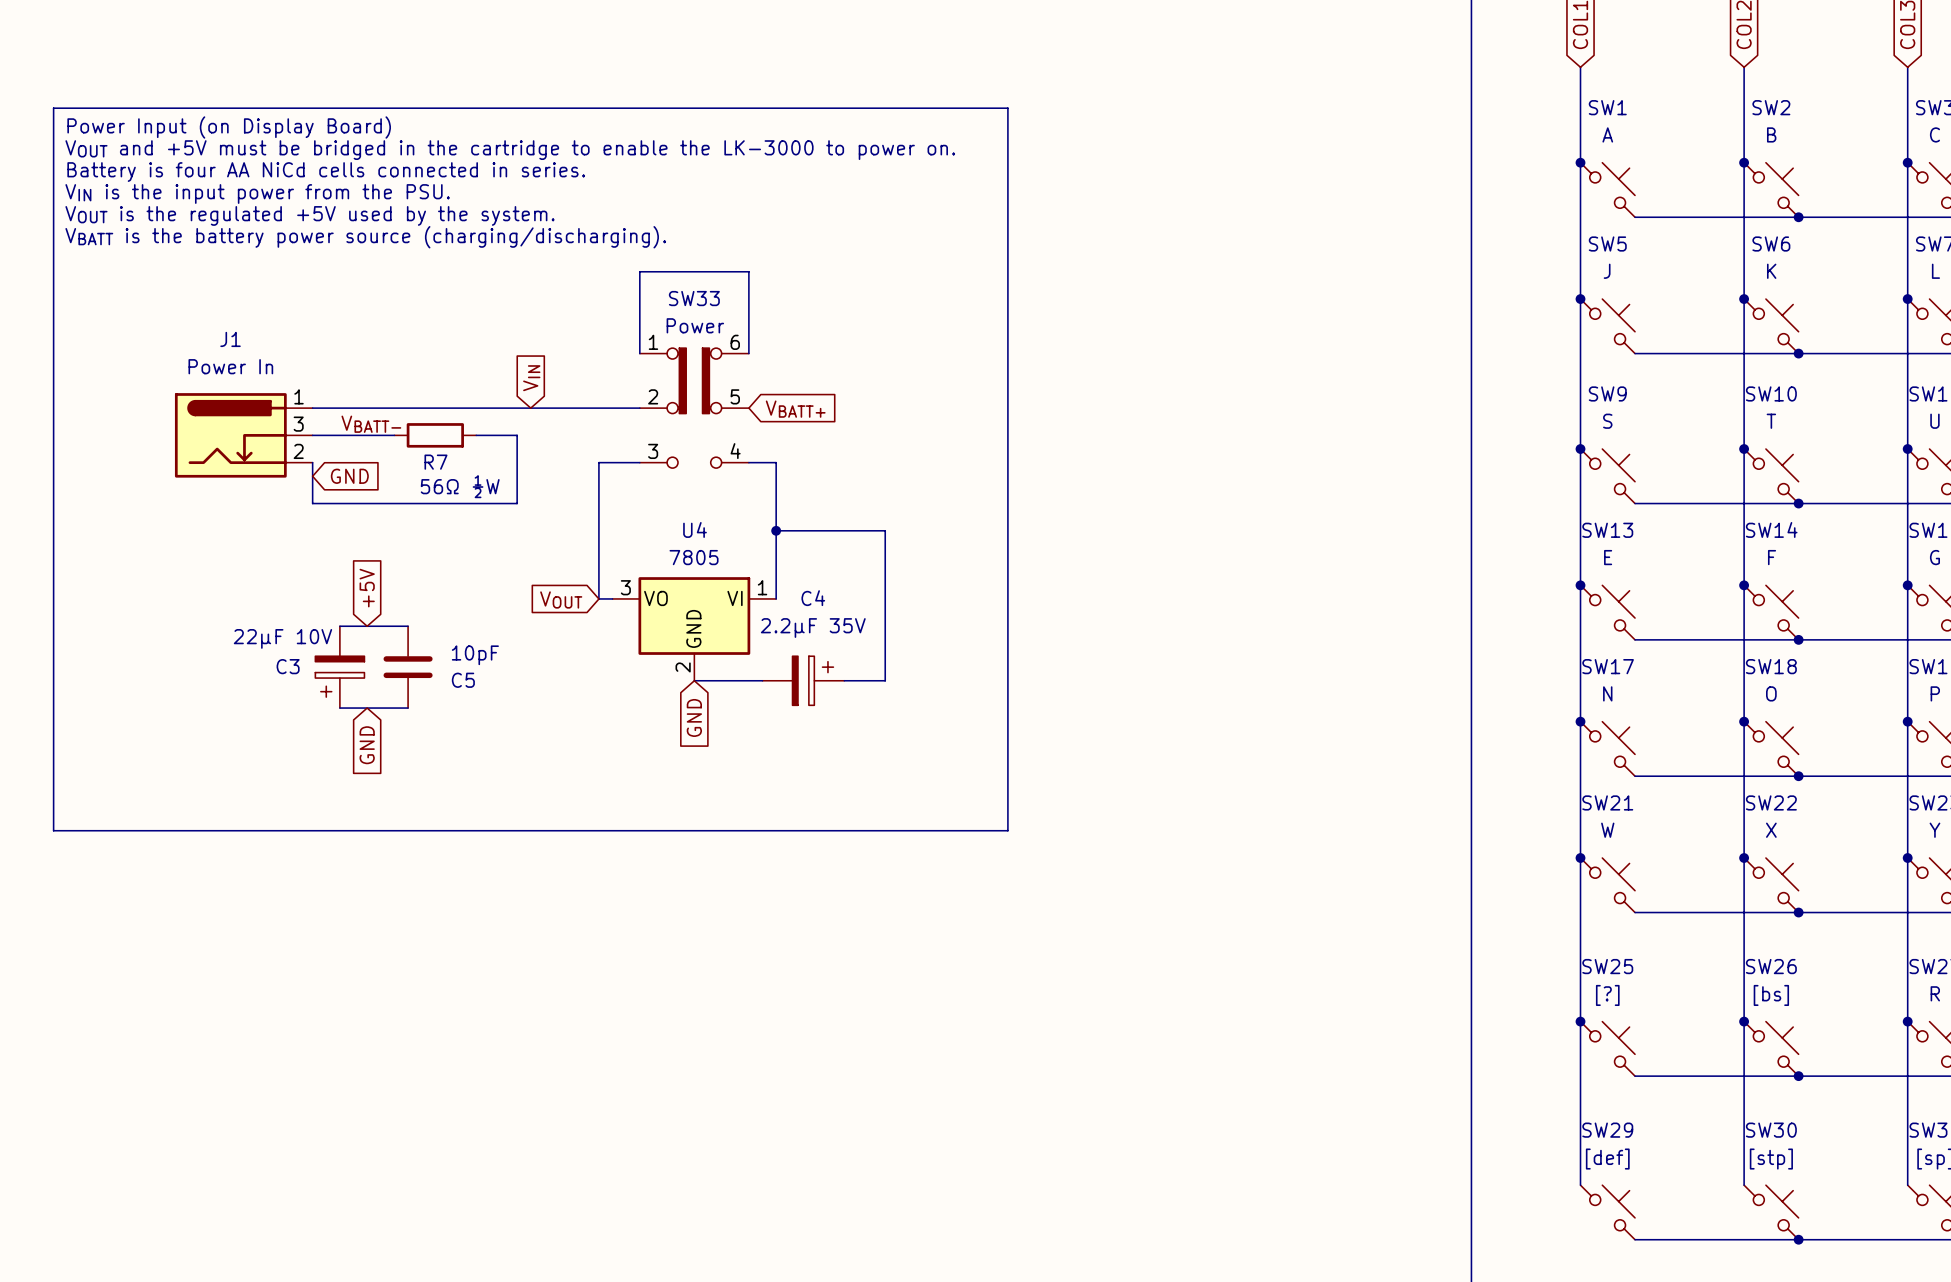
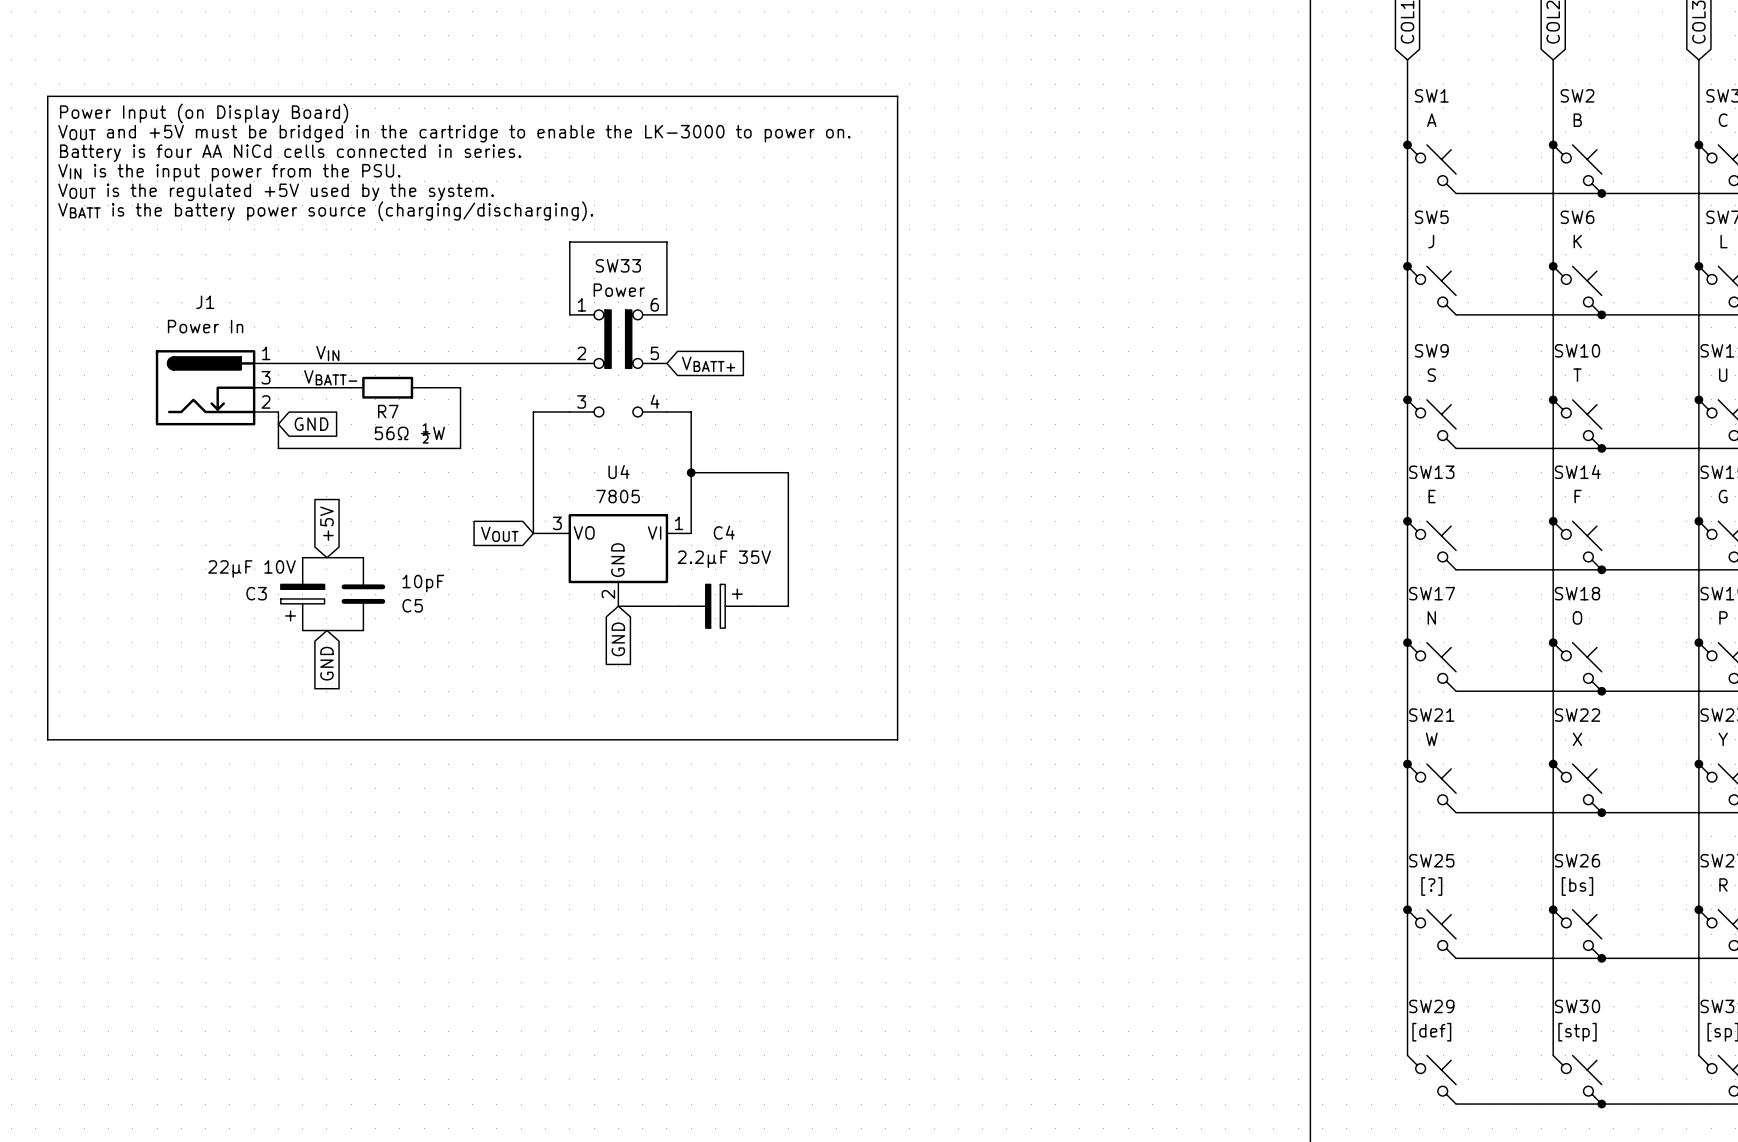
global label: VIN (531, 378) -> none
label: none -> VIN (327, 353)

